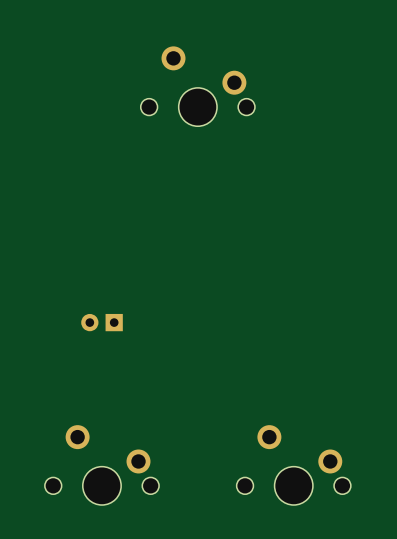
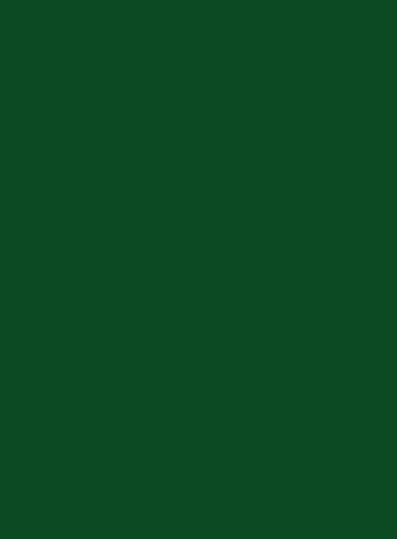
part: (197, 86) -> none
part: (102, 322) -> none
part: (101, 465) -> none
part: (293, 465) -> none

